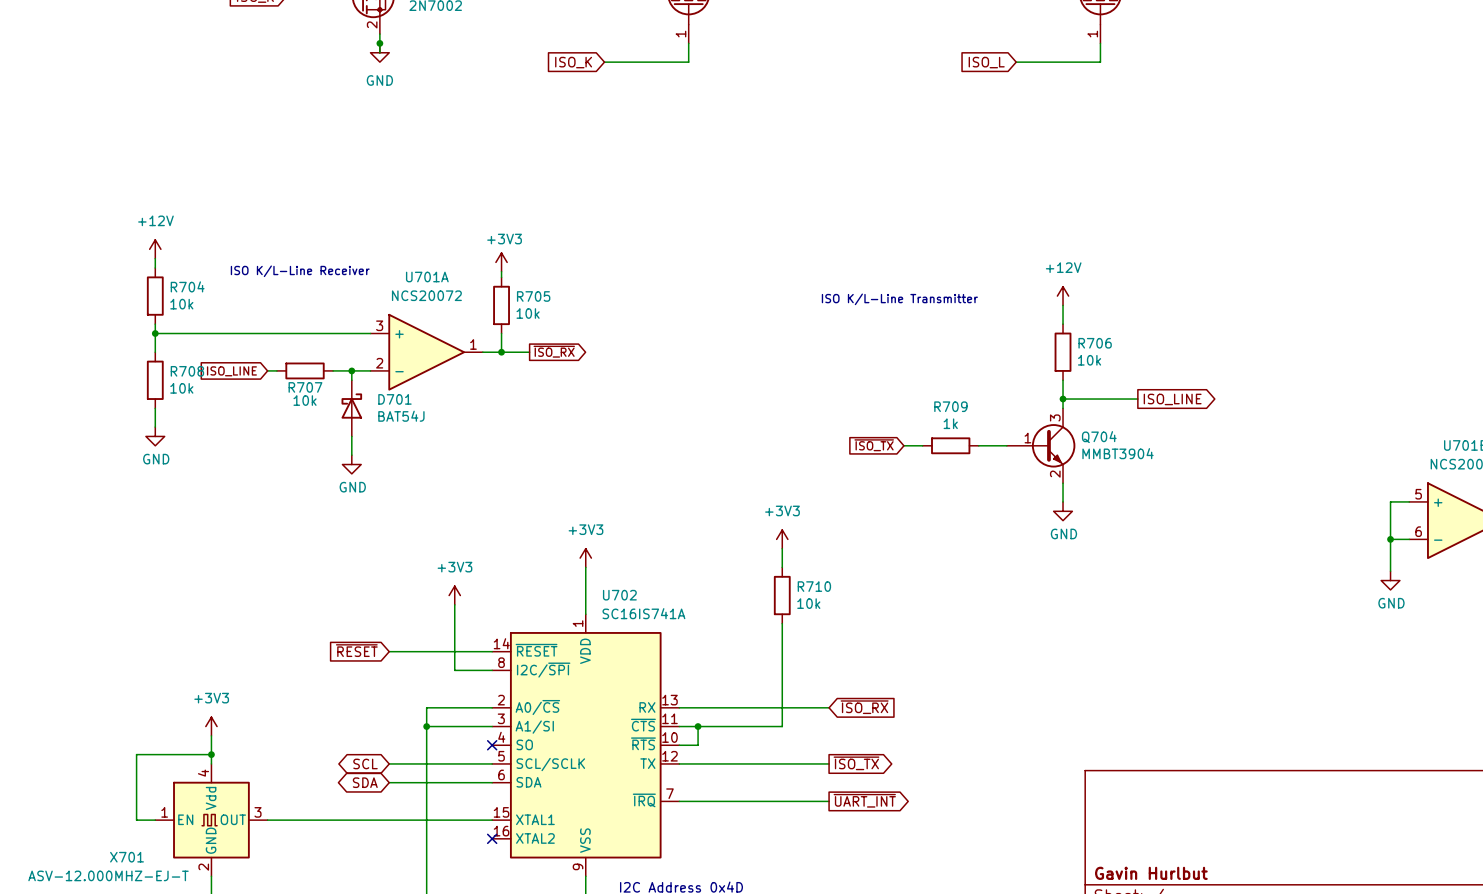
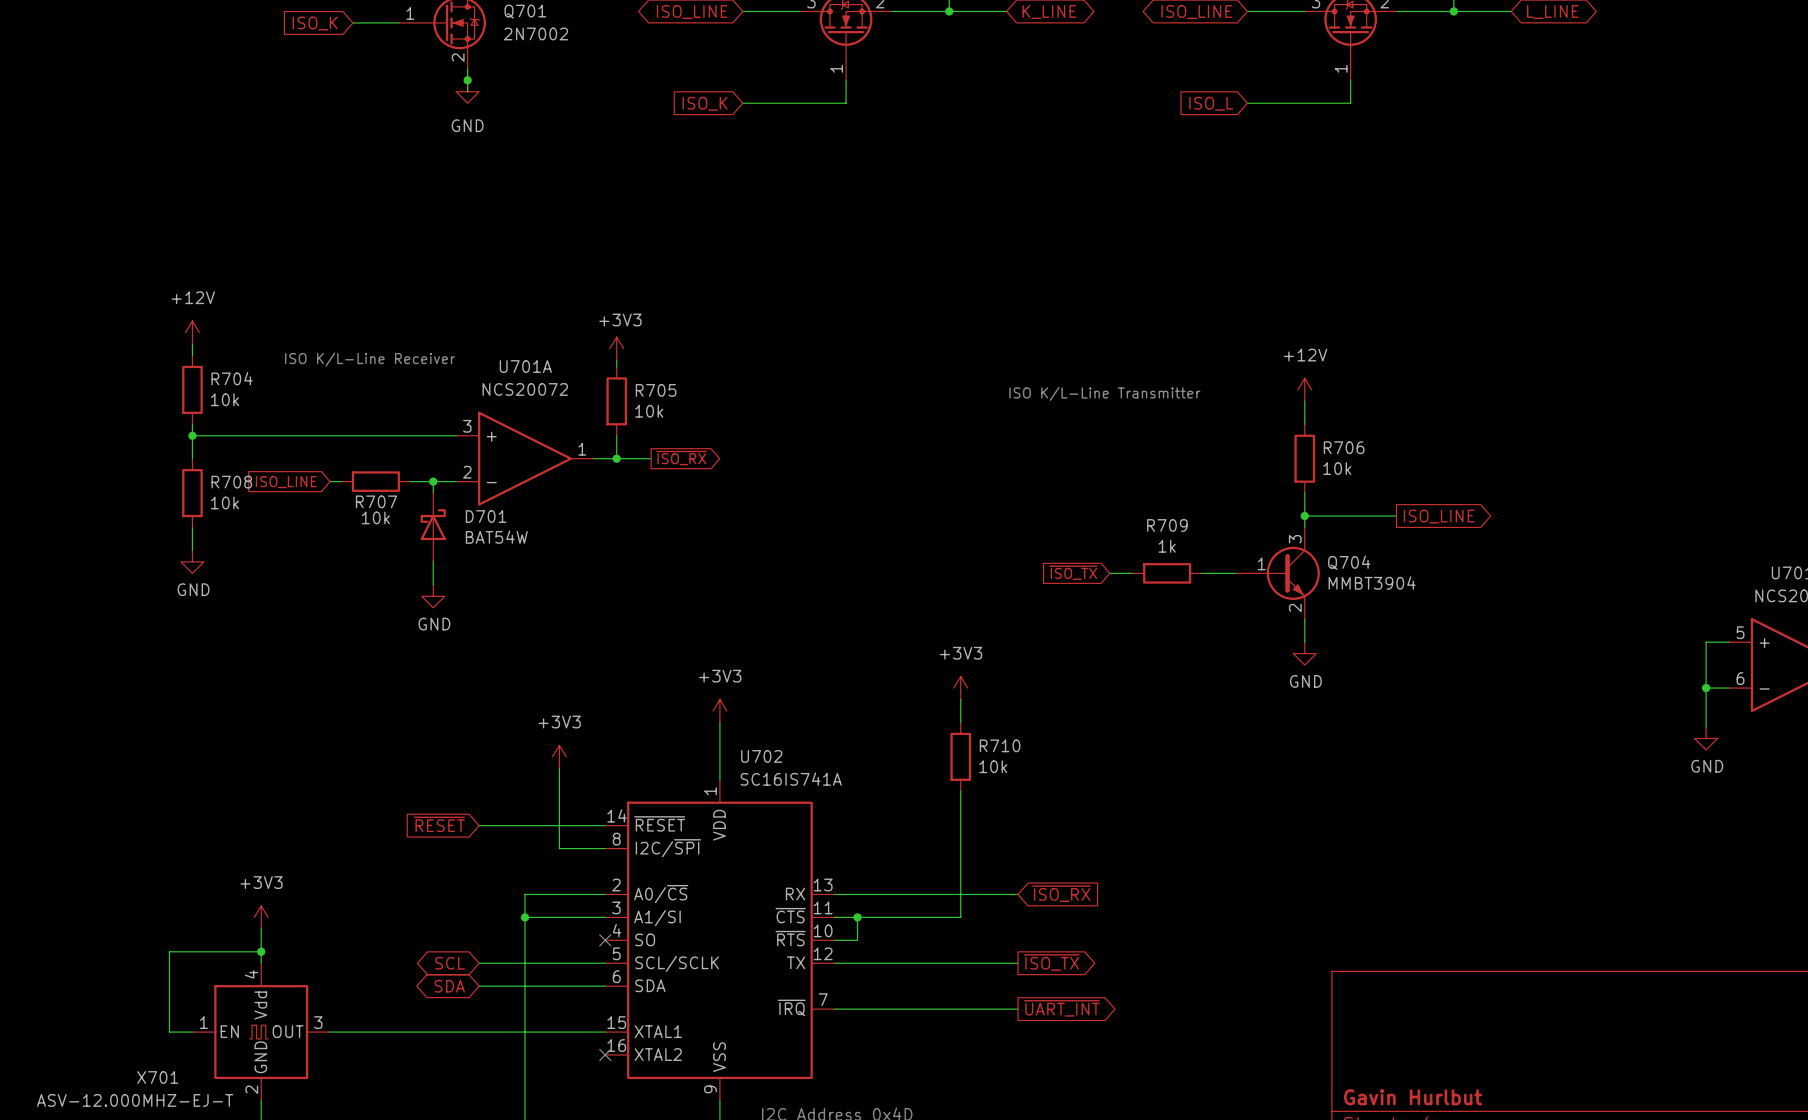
D701 value: BAT54J (401, 416) -> BAT54W (496, 537)

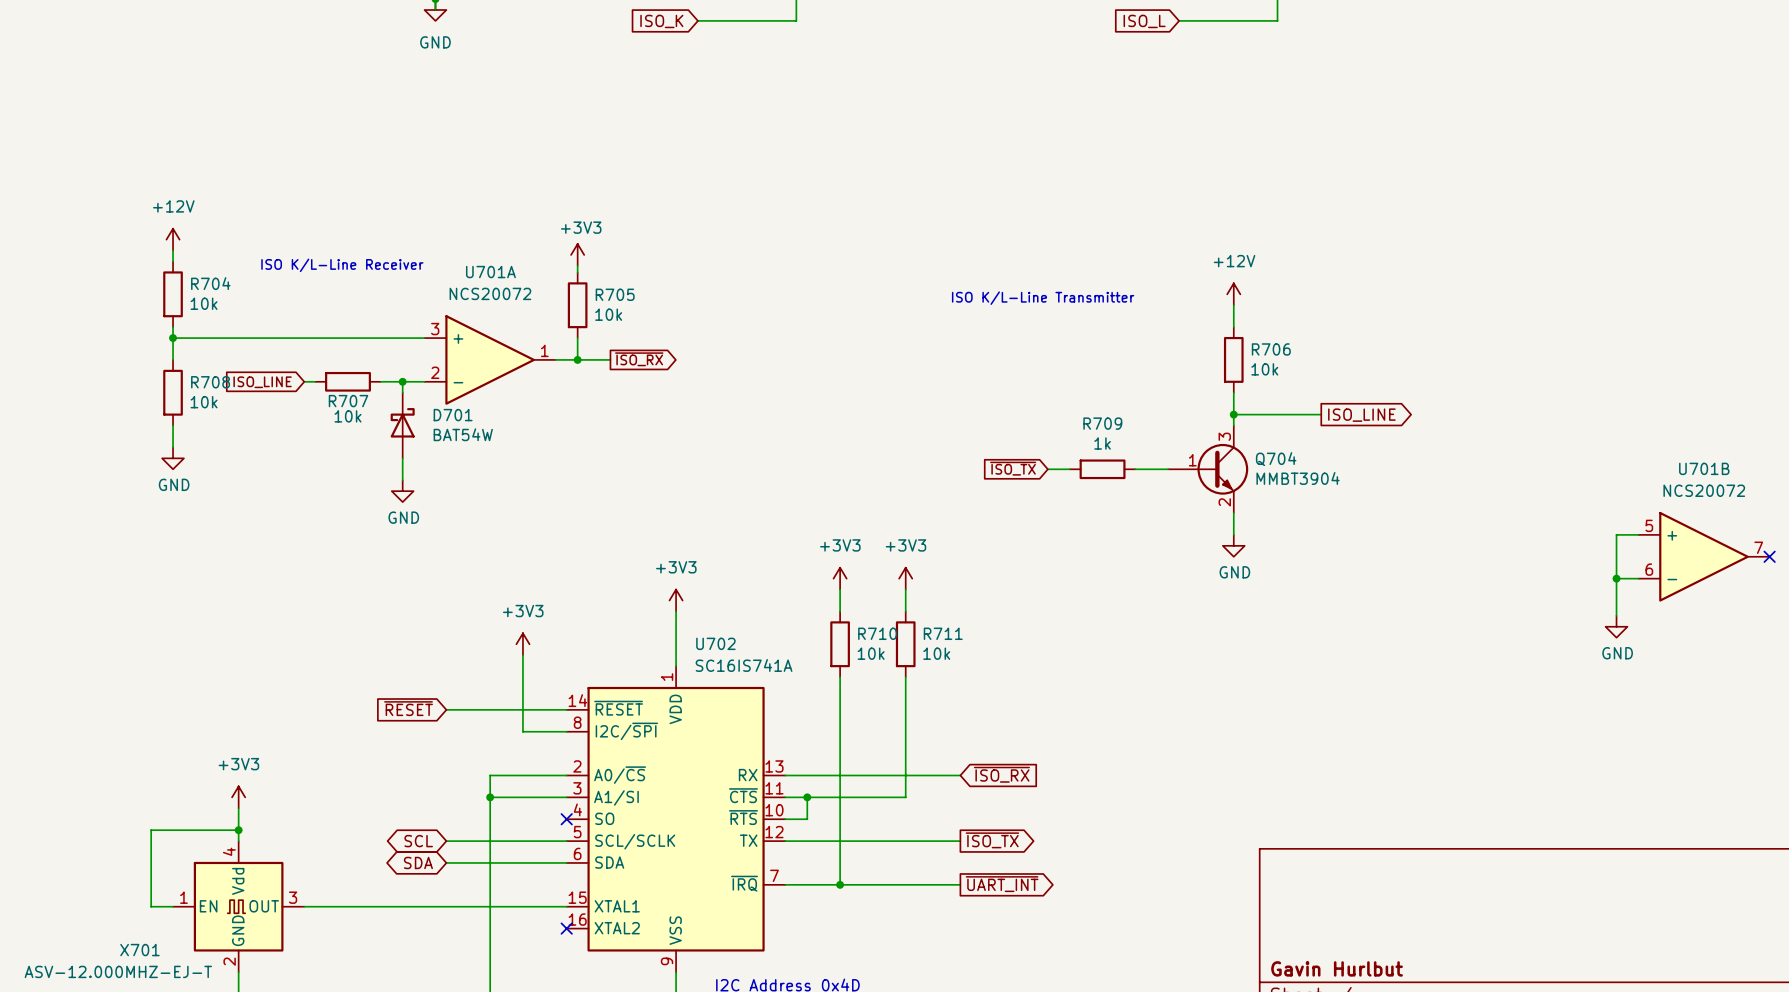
power symbol: none -> +3V3 (840, 578)
wire: none -> (840, 589) (840, 611)
R710 name: R710 (1000, 745) -> R711 (943, 633)
R710: none -> 10k (840, 644)
wire: none -> (840, 677) (840, 884)
junction: none -> (840, 884)

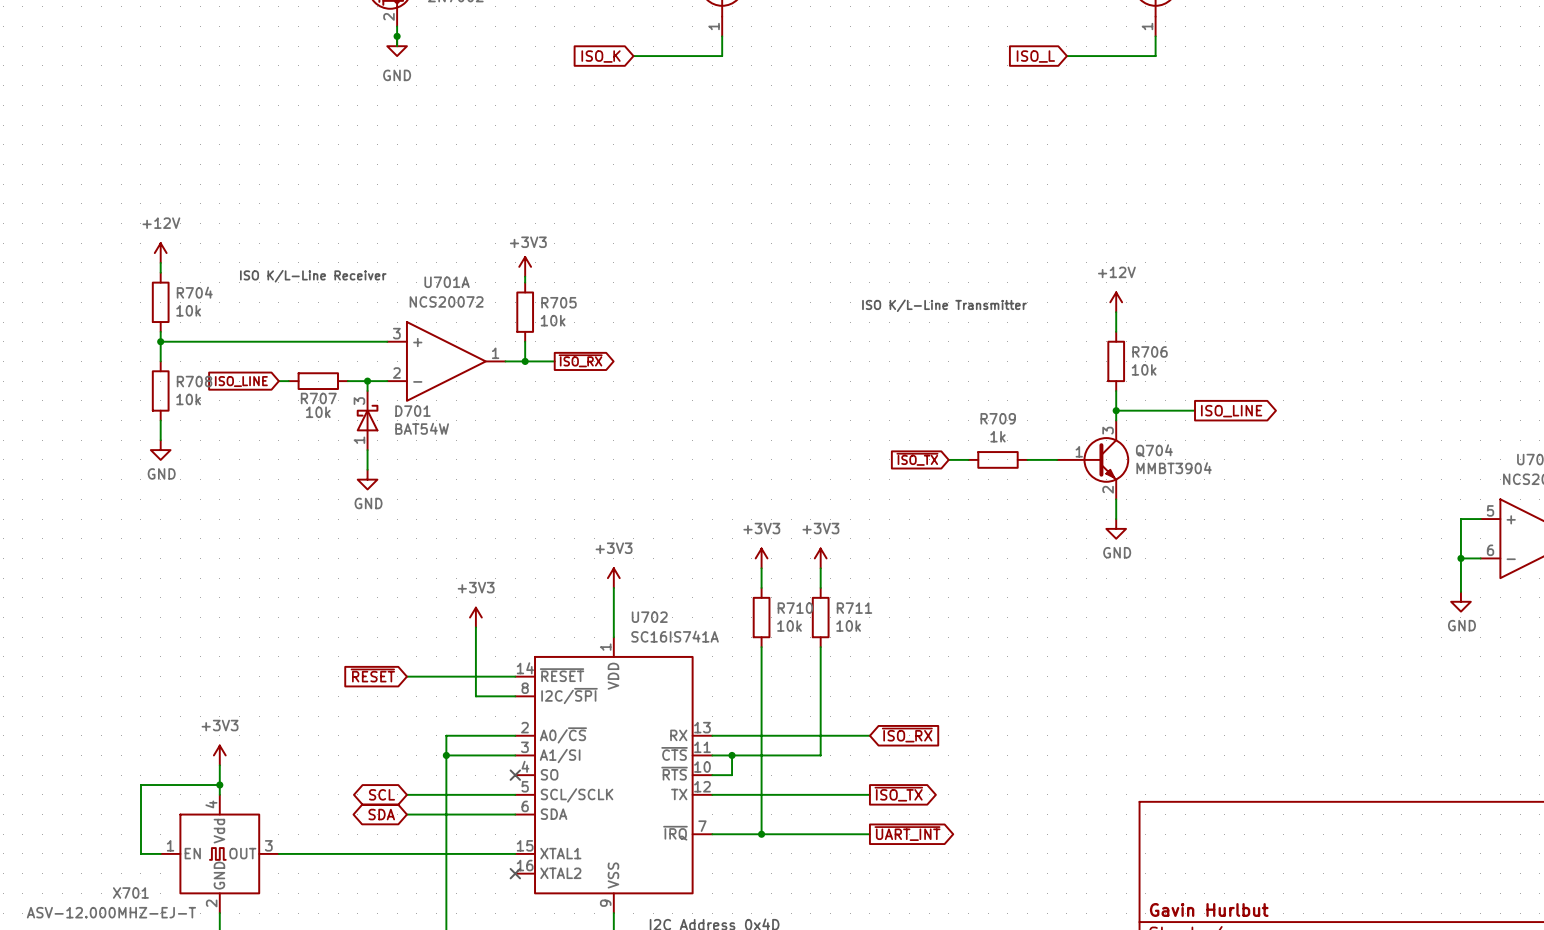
D701 pin number: none -> 3 (359, 401)
D701 pin number: none -> 1 (359, 440)

